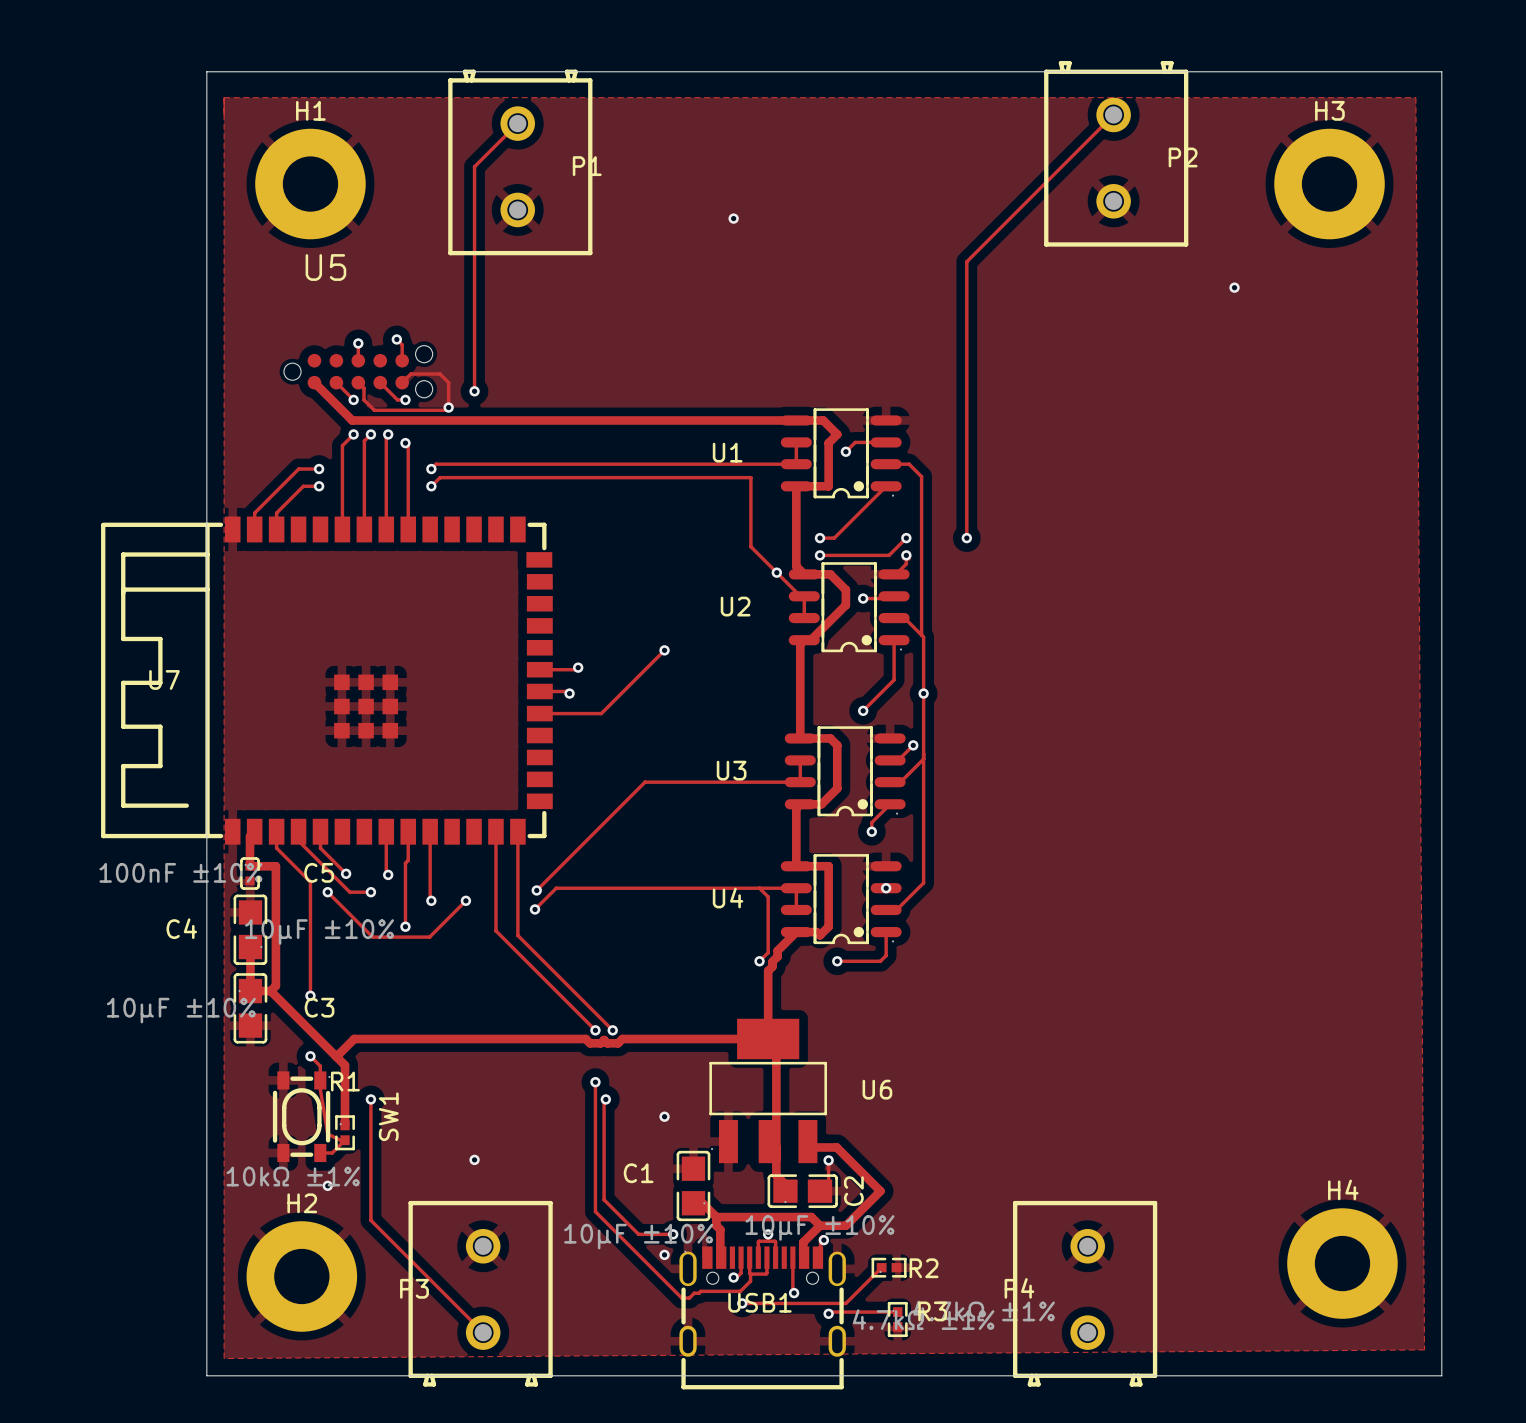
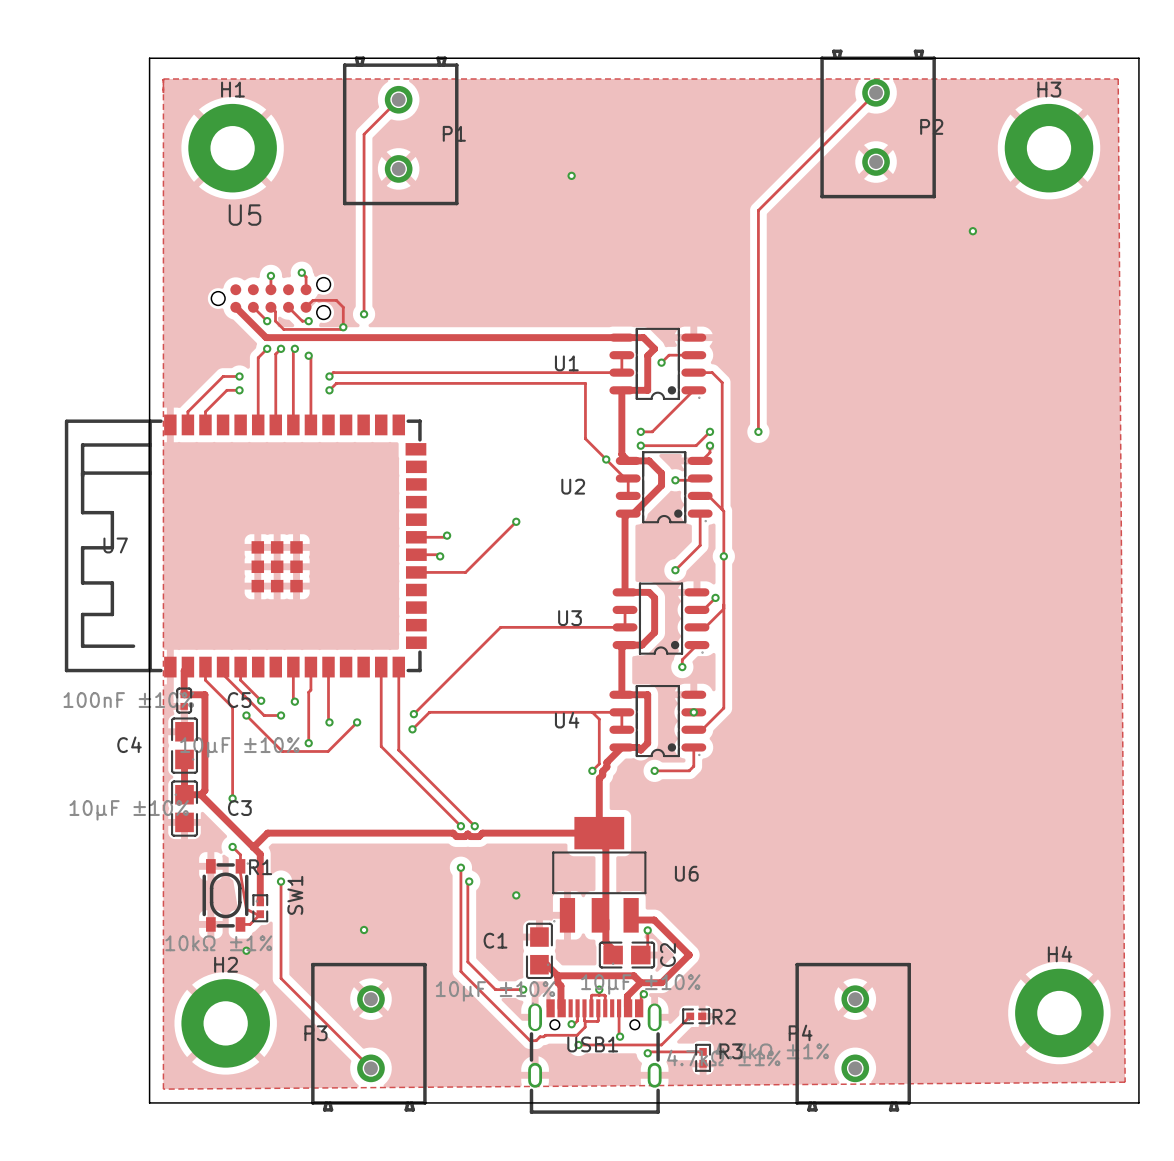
via: (664, 1254) -> none

